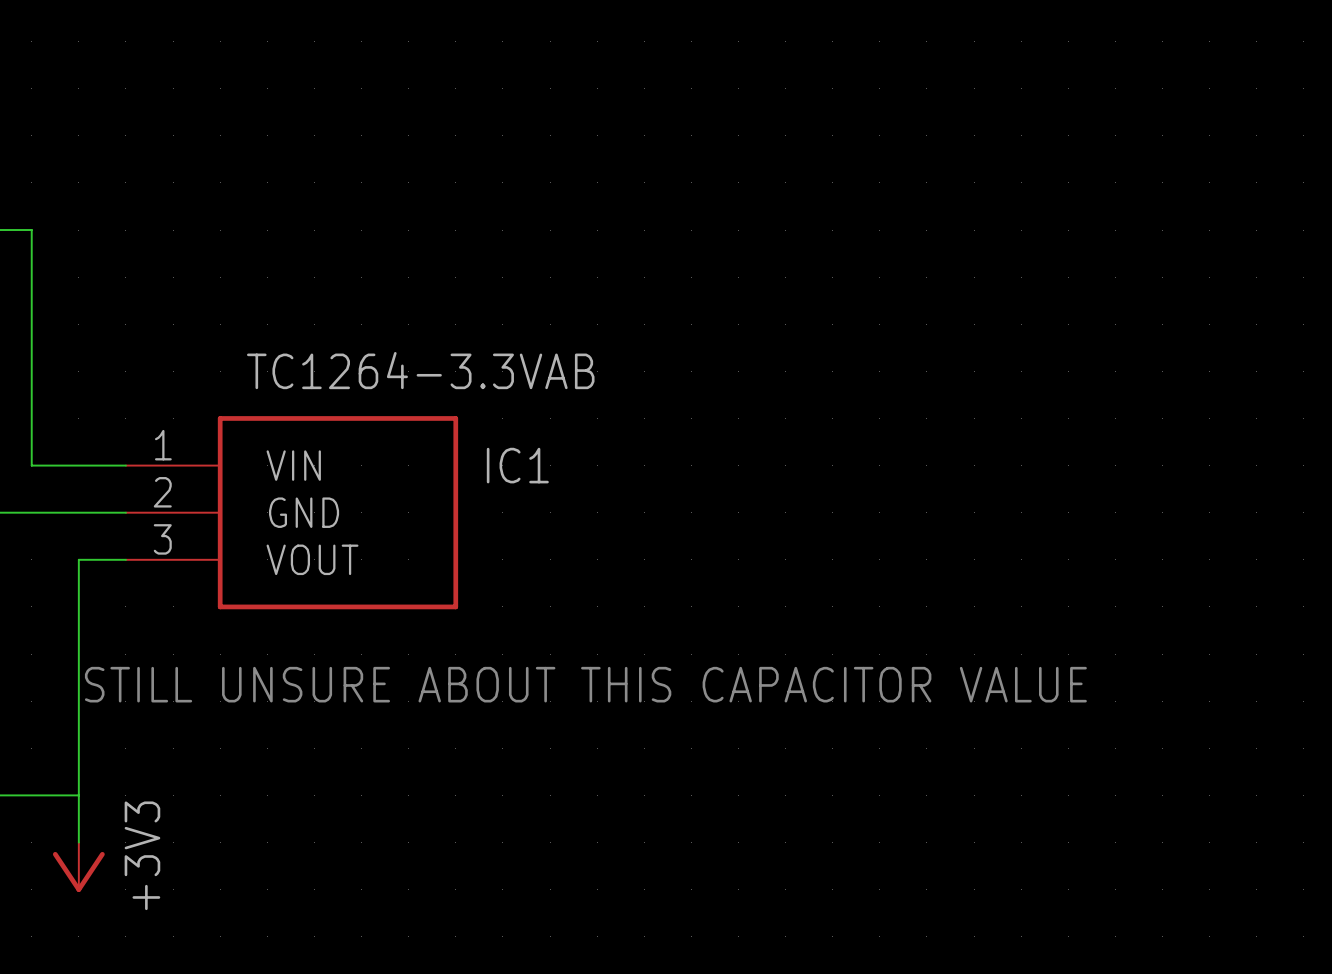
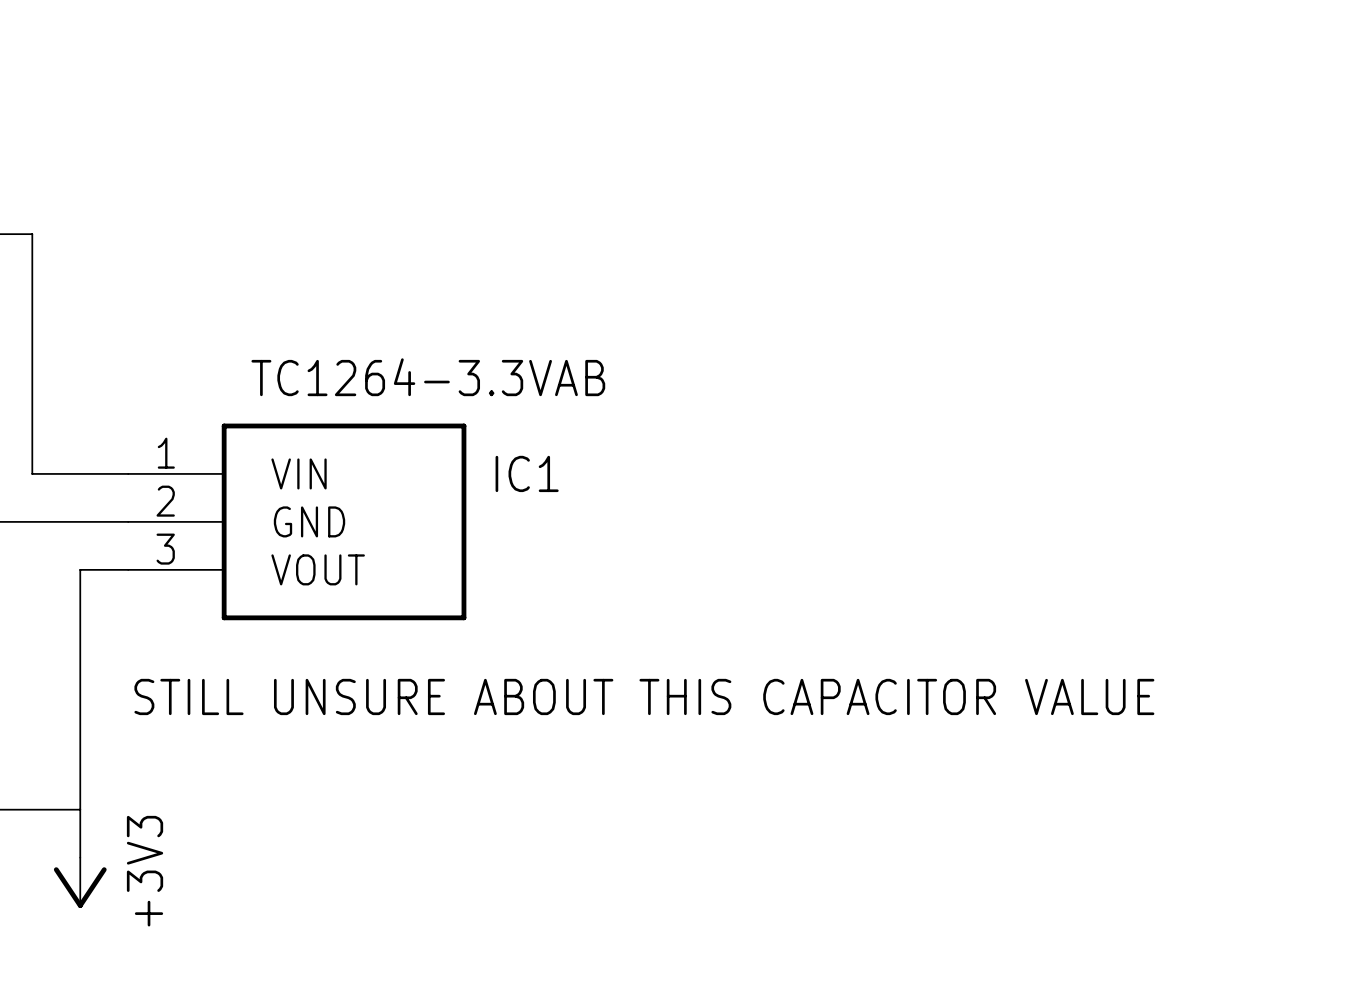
text position: STILL UNSURE ABOUT THIS CAPACITOR VALUE (585, 684) -> STILL UNSURE ABOUT THIS CAPACITOR VALUE (644, 696)

